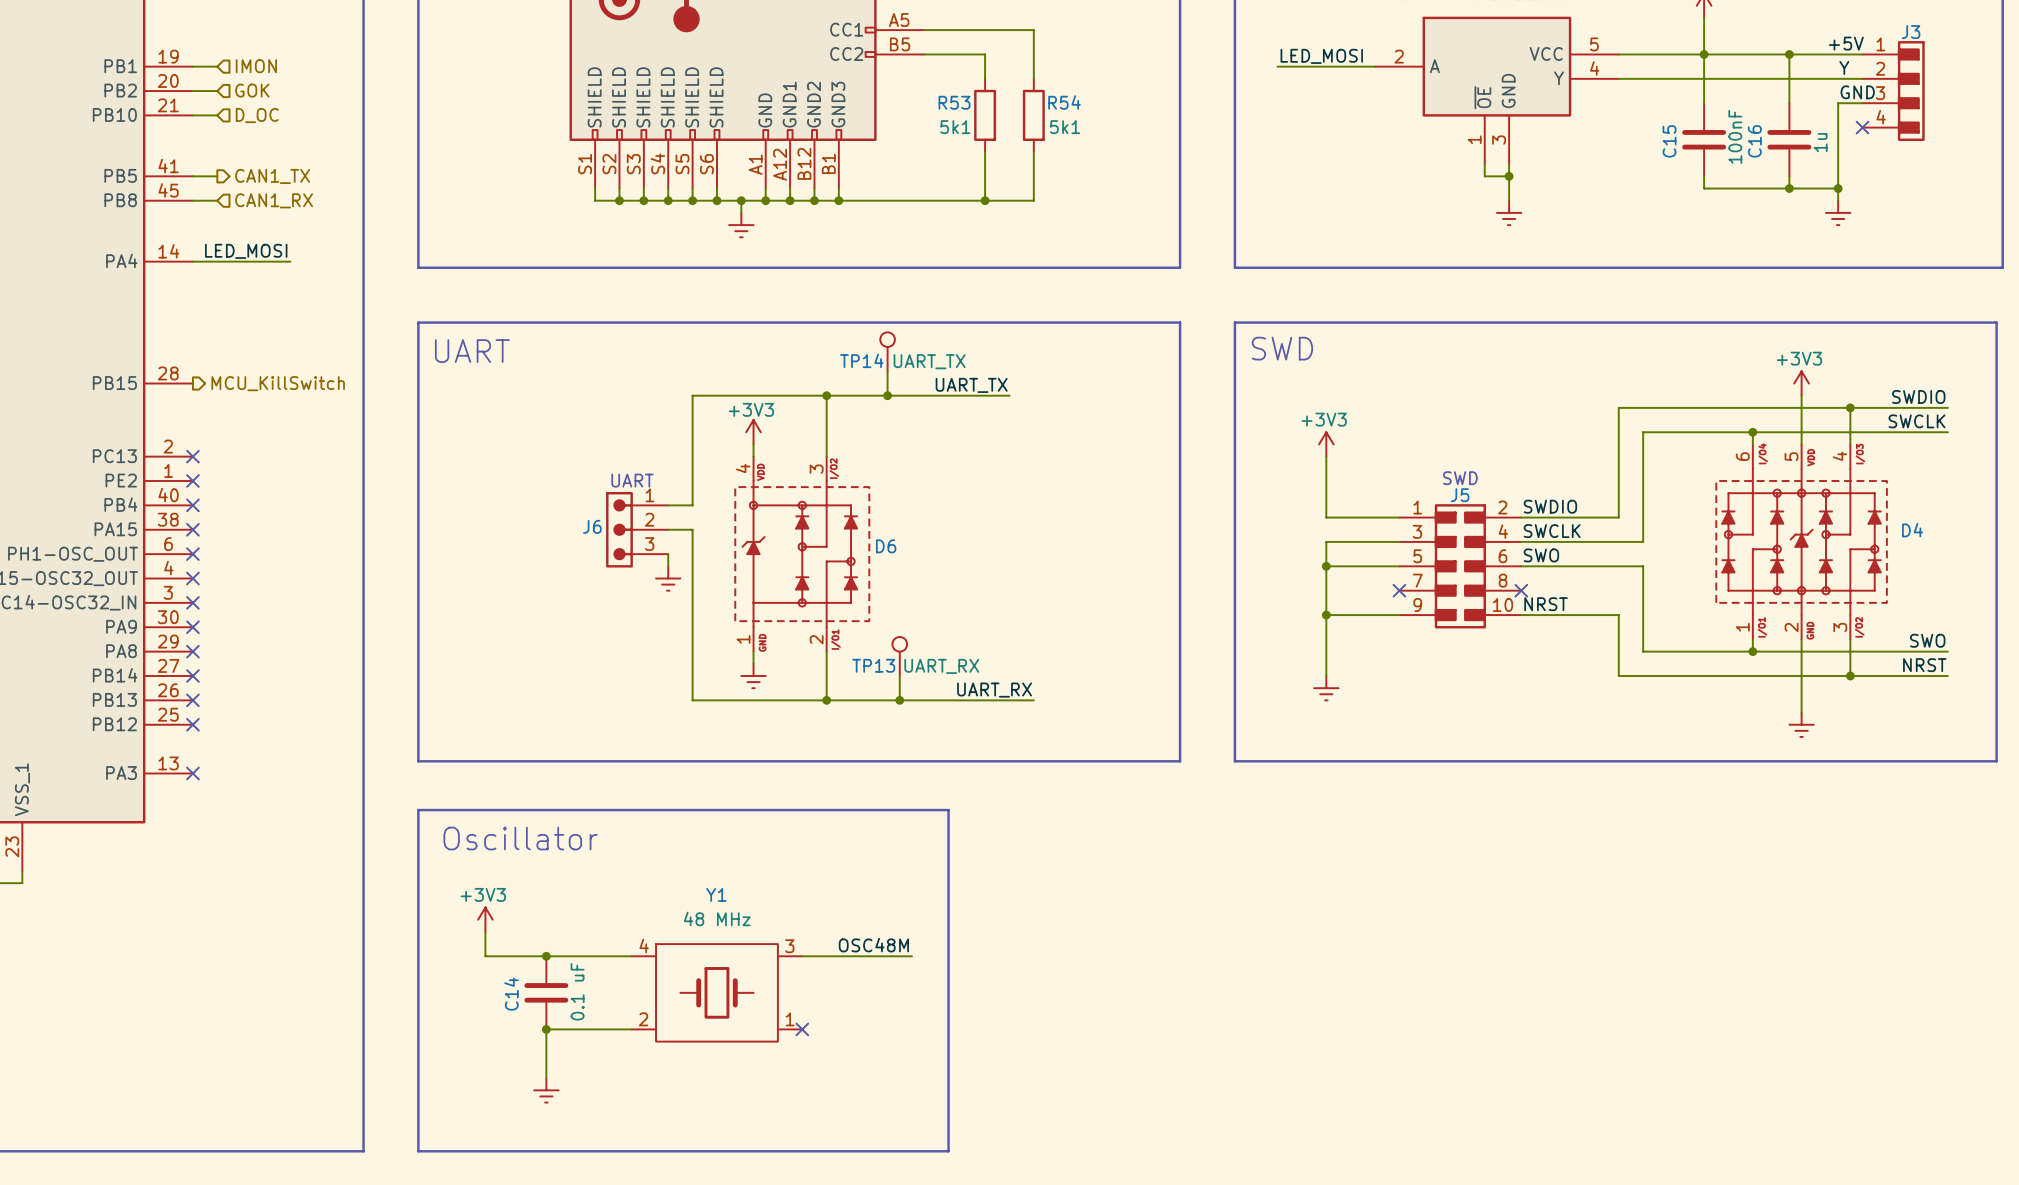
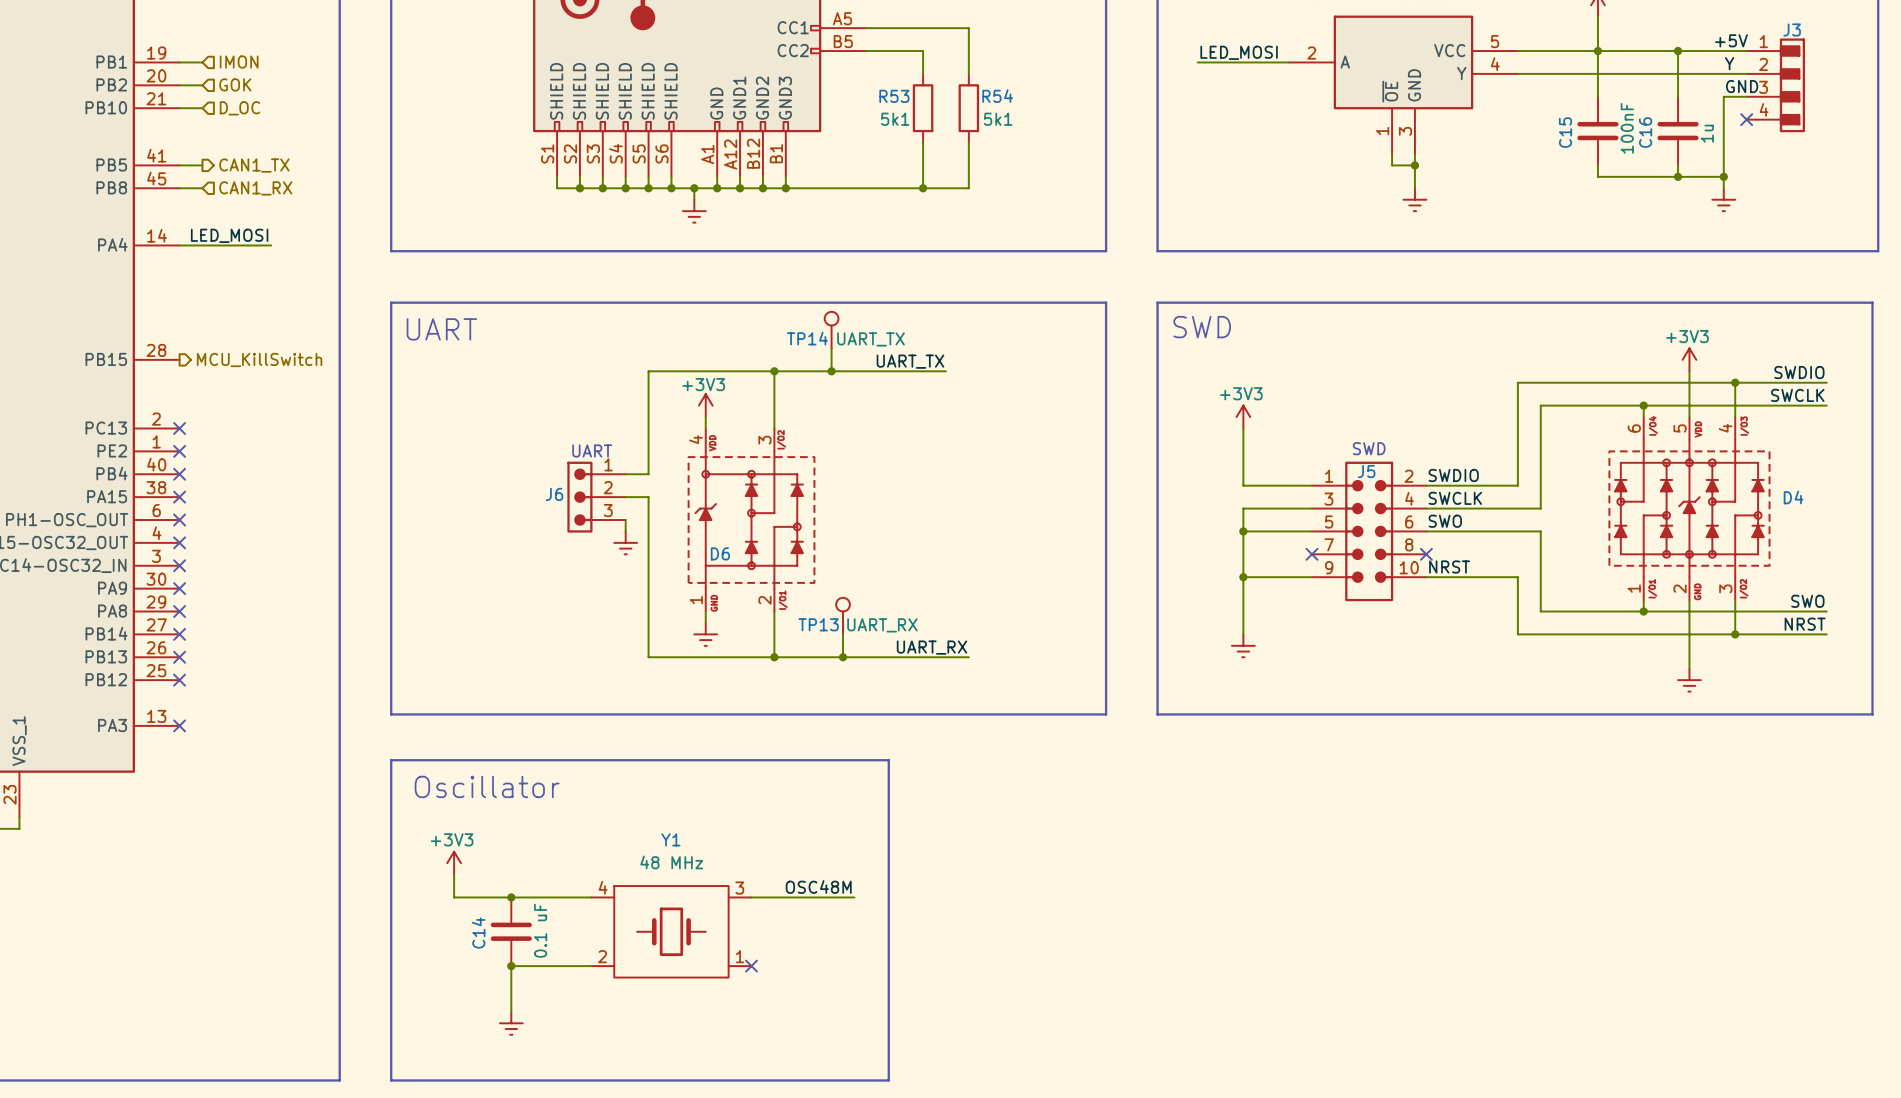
J5 symbol: [1399, 504, 1522, 629] -> [1312, 461, 1427, 602]
D6 name position: D6 (886, 546) -> D6 (720, 553)

